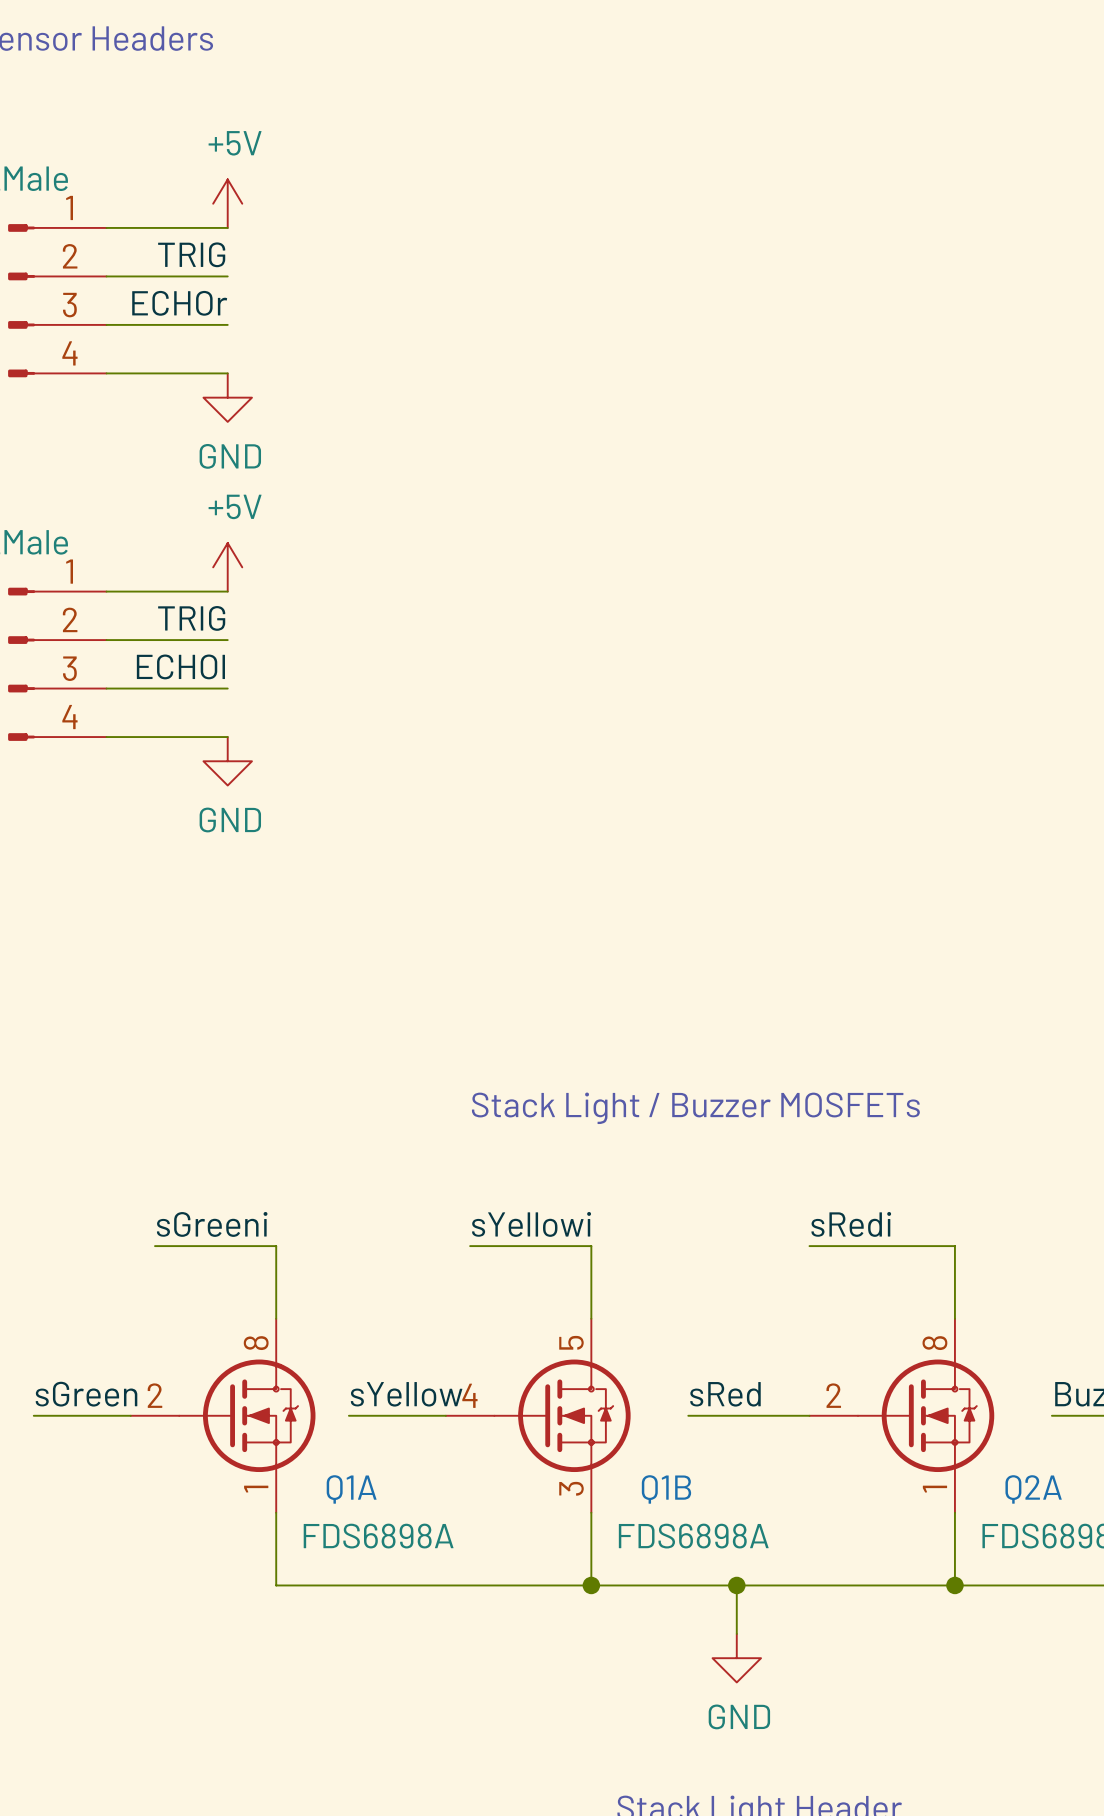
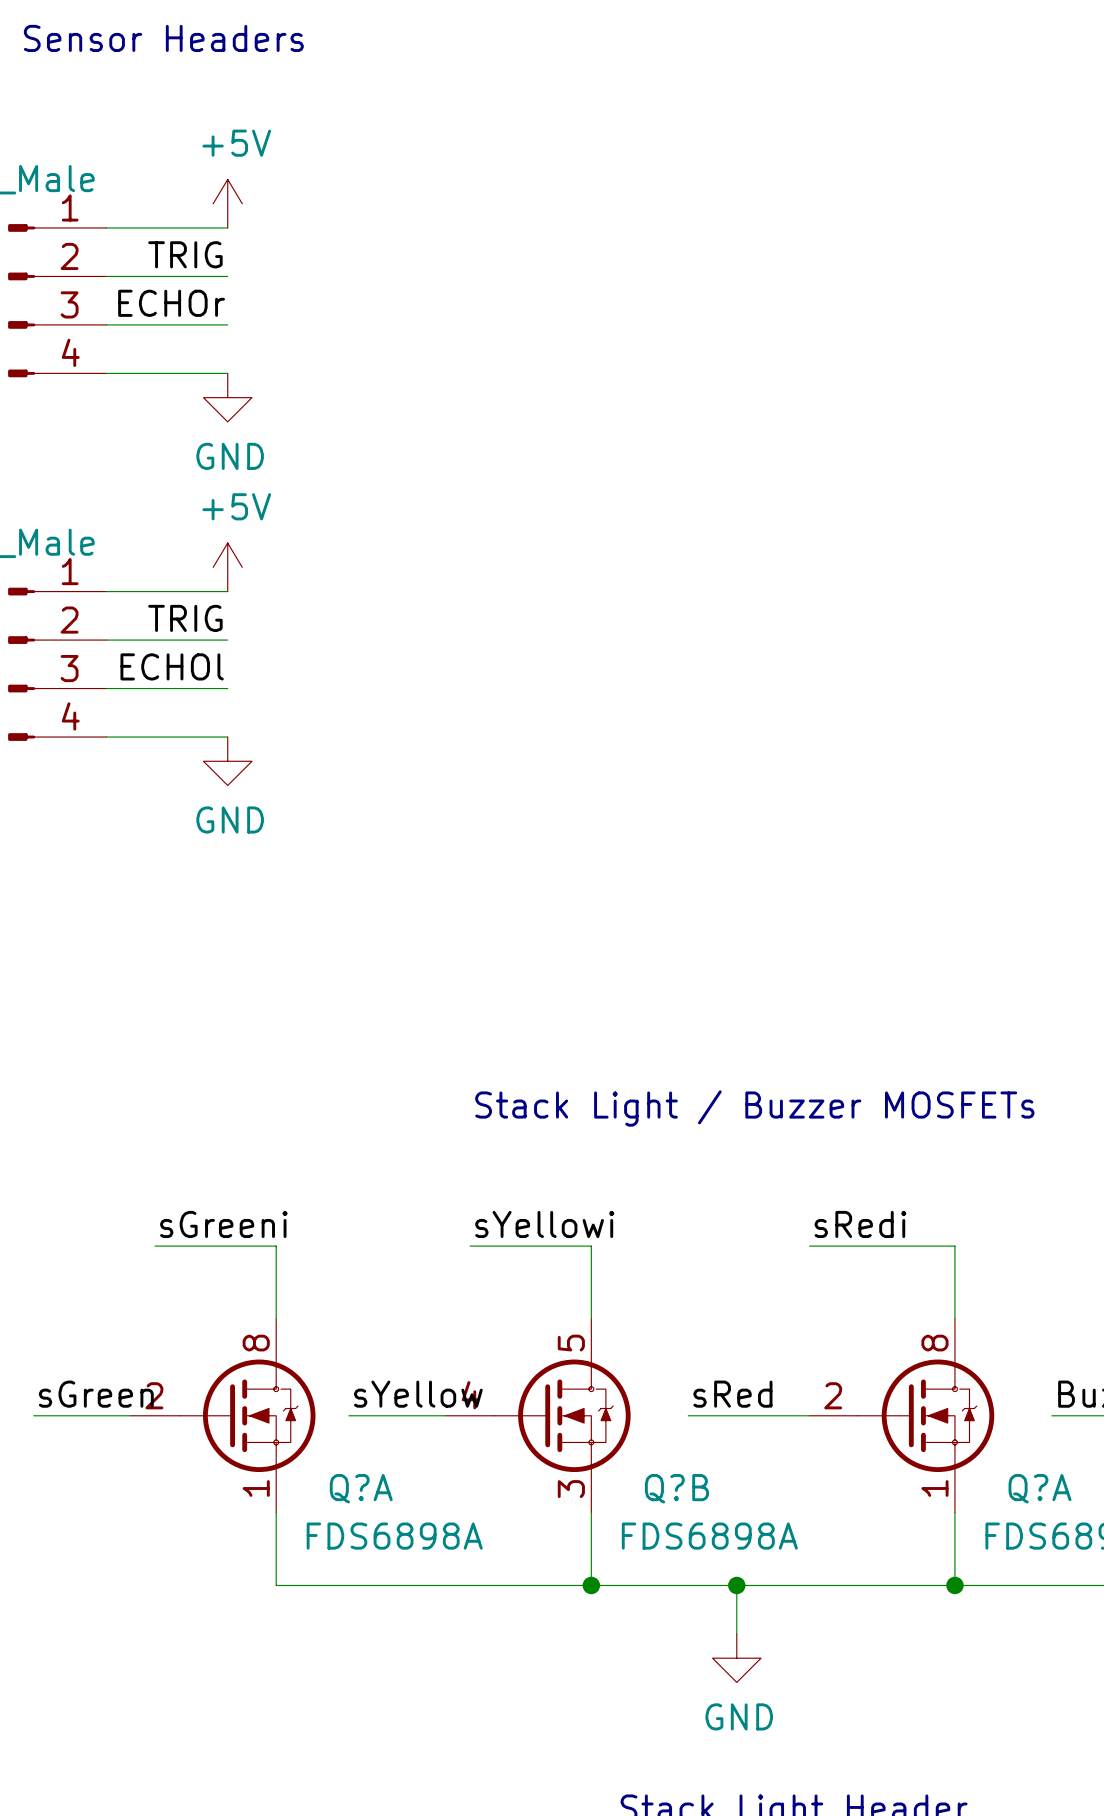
Q1A name: Q1A (351, 1489) -> Q?A (361, 1488)
Q1B name: Q1B (666, 1489) -> Q?B (676, 1488)
Q2A name: Q2A (1033, 1489) -> Q?A (1039, 1488)

